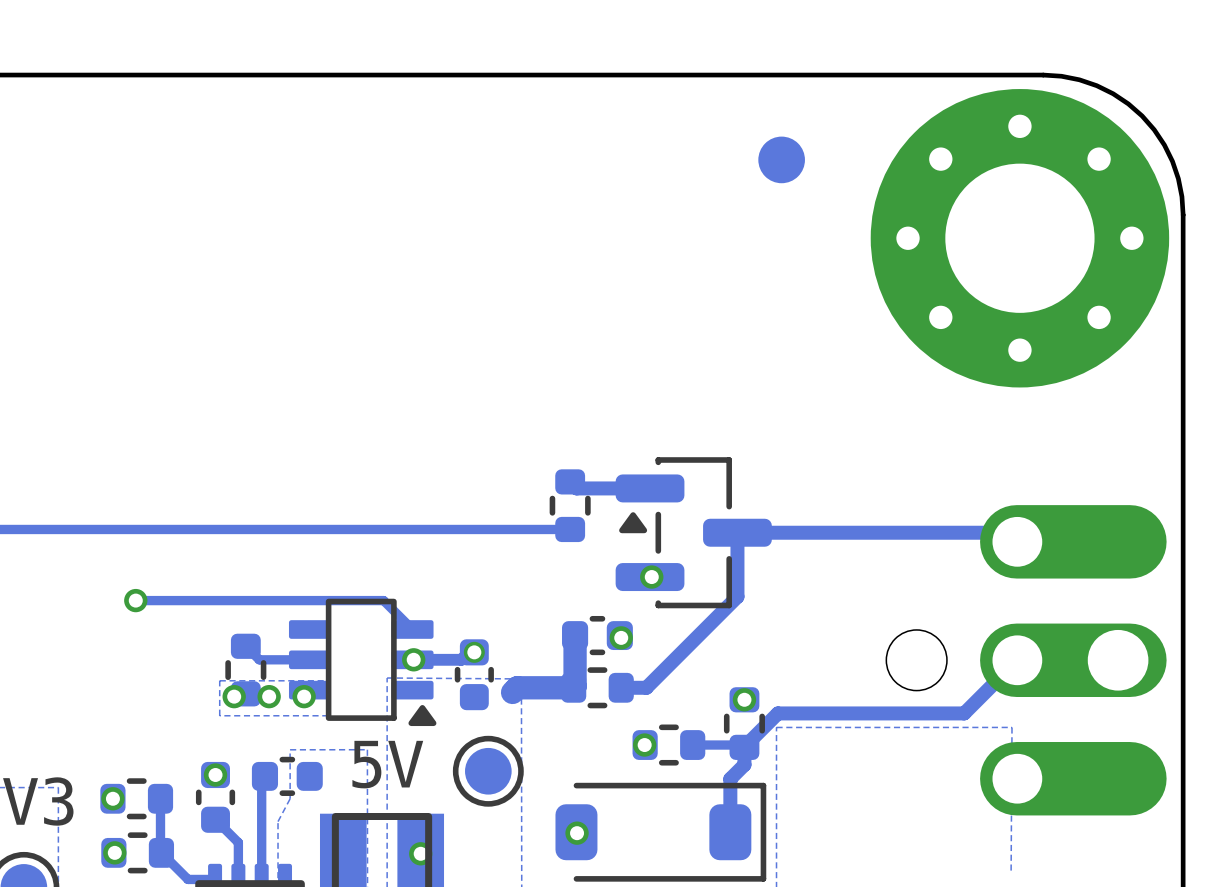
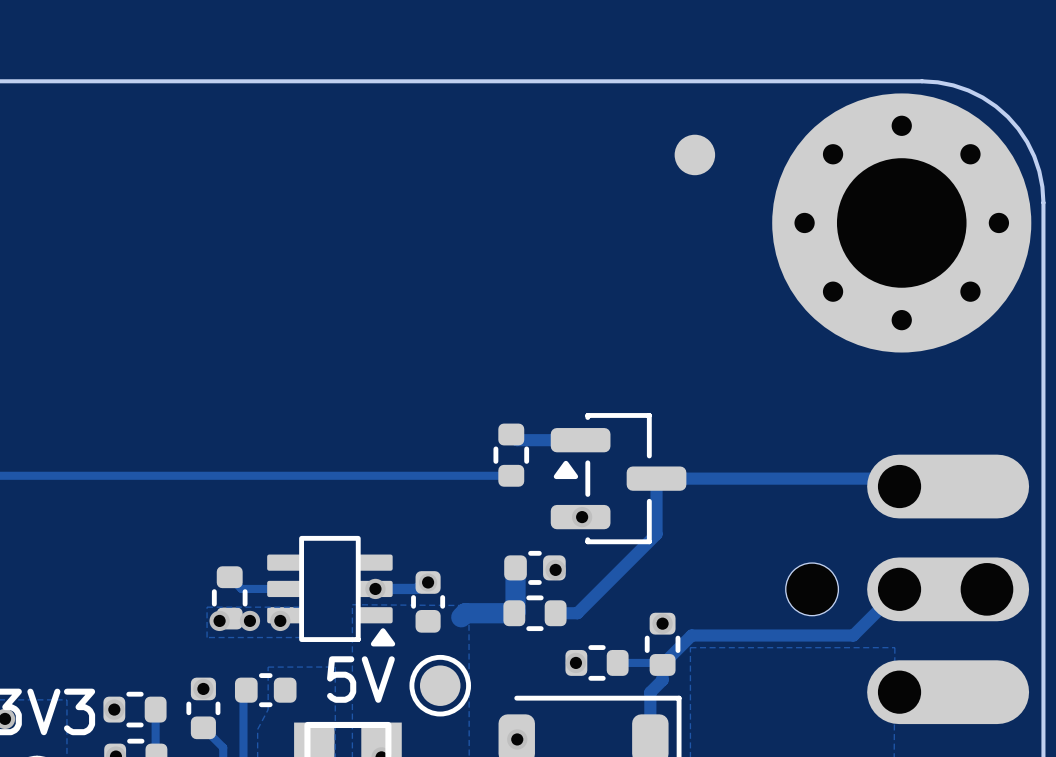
track: (135, 600) (383, 600) (412, 629) -> none
via: (135, 600) -> none

